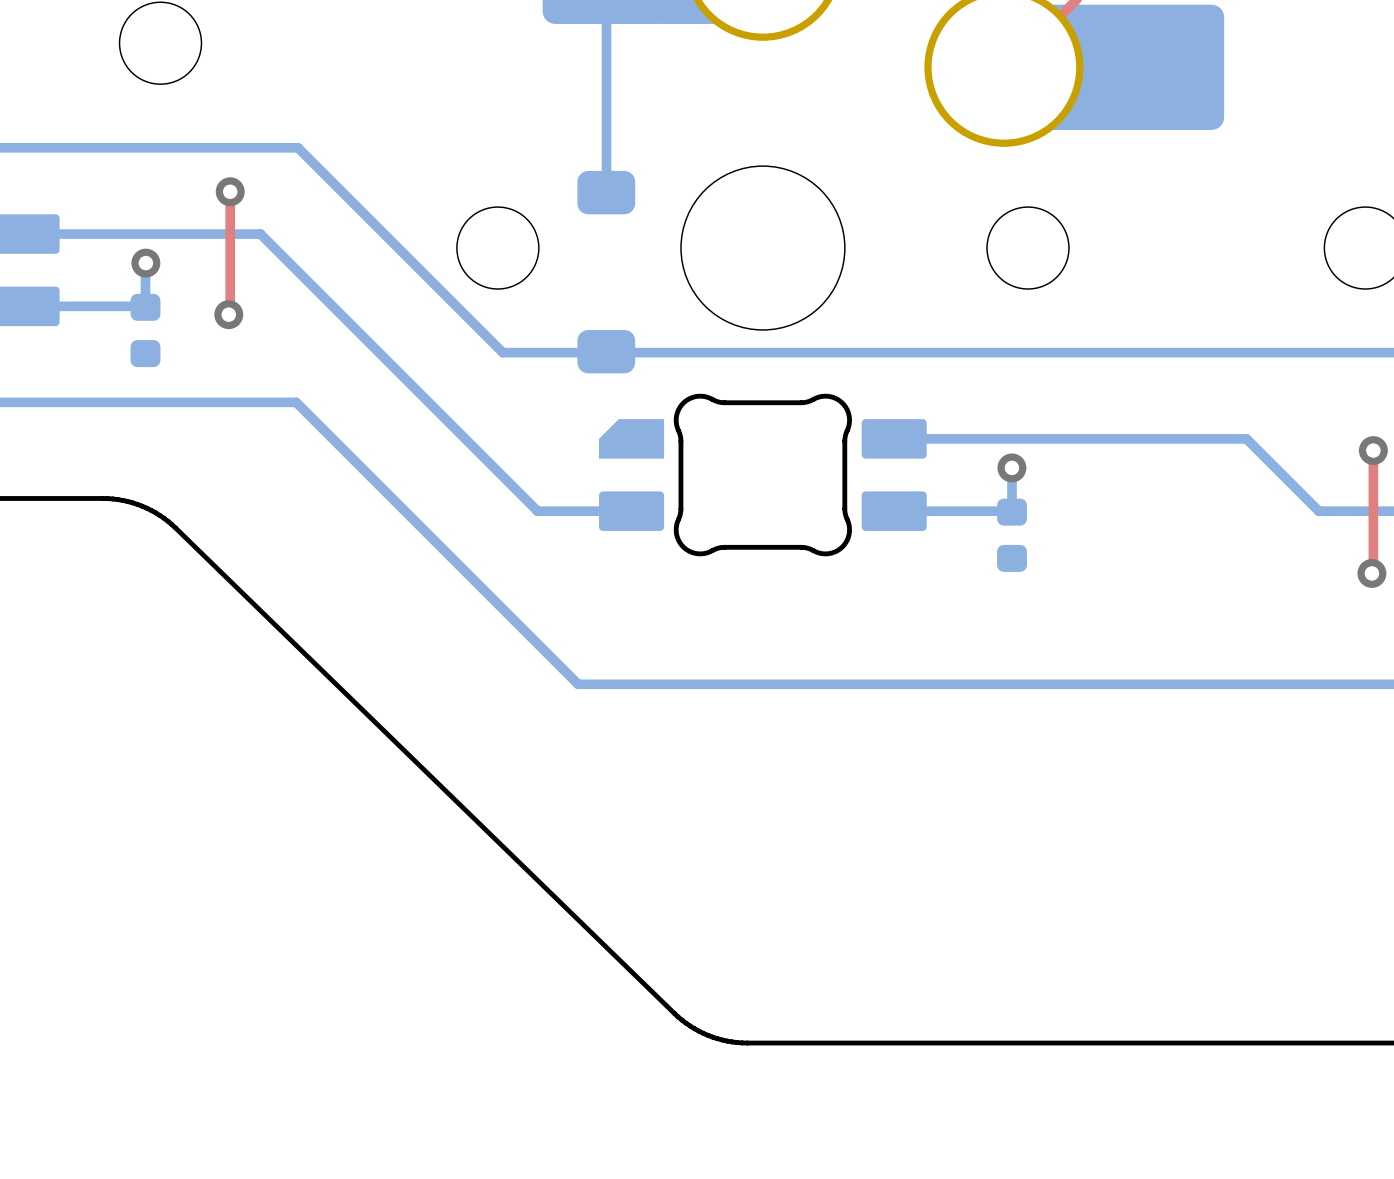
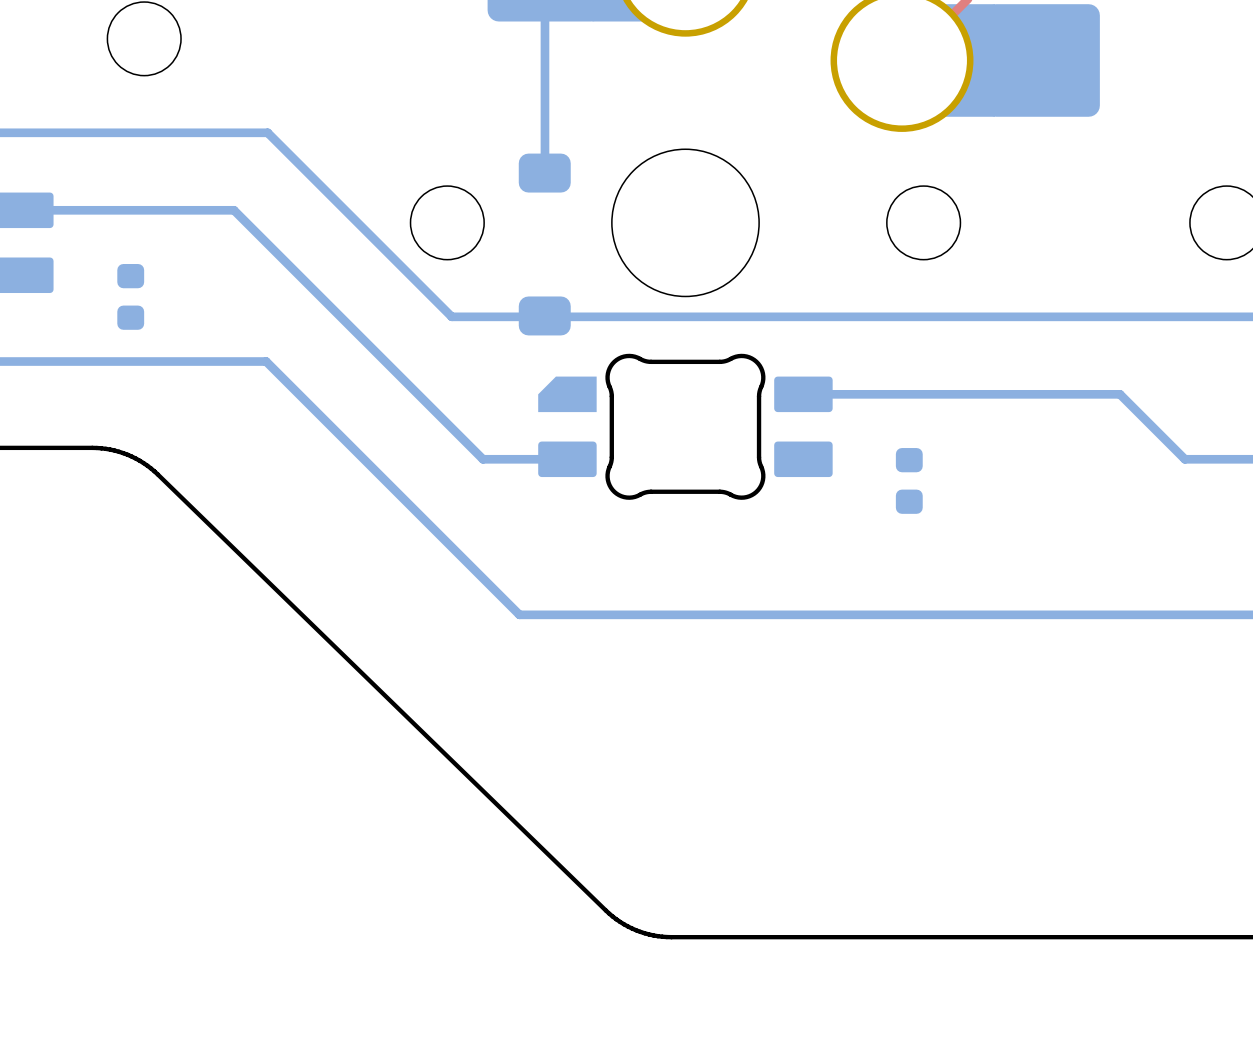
top track: (230, 191) (230, 313) -> none
via: (230, 191) -> none
bottom track: (145, 263) (145, 307) (27, 306) -> none
via: (145, 263) -> none
via: (228, 314) -> none
top track: (1373, 450) (1373, 572) -> none
via: (1373, 450) -> none
via: (1011, 467) -> none
bottom track: (1012, 468) (1012, 512) (894, 511) -> none
via: (1371, 573) -> none

